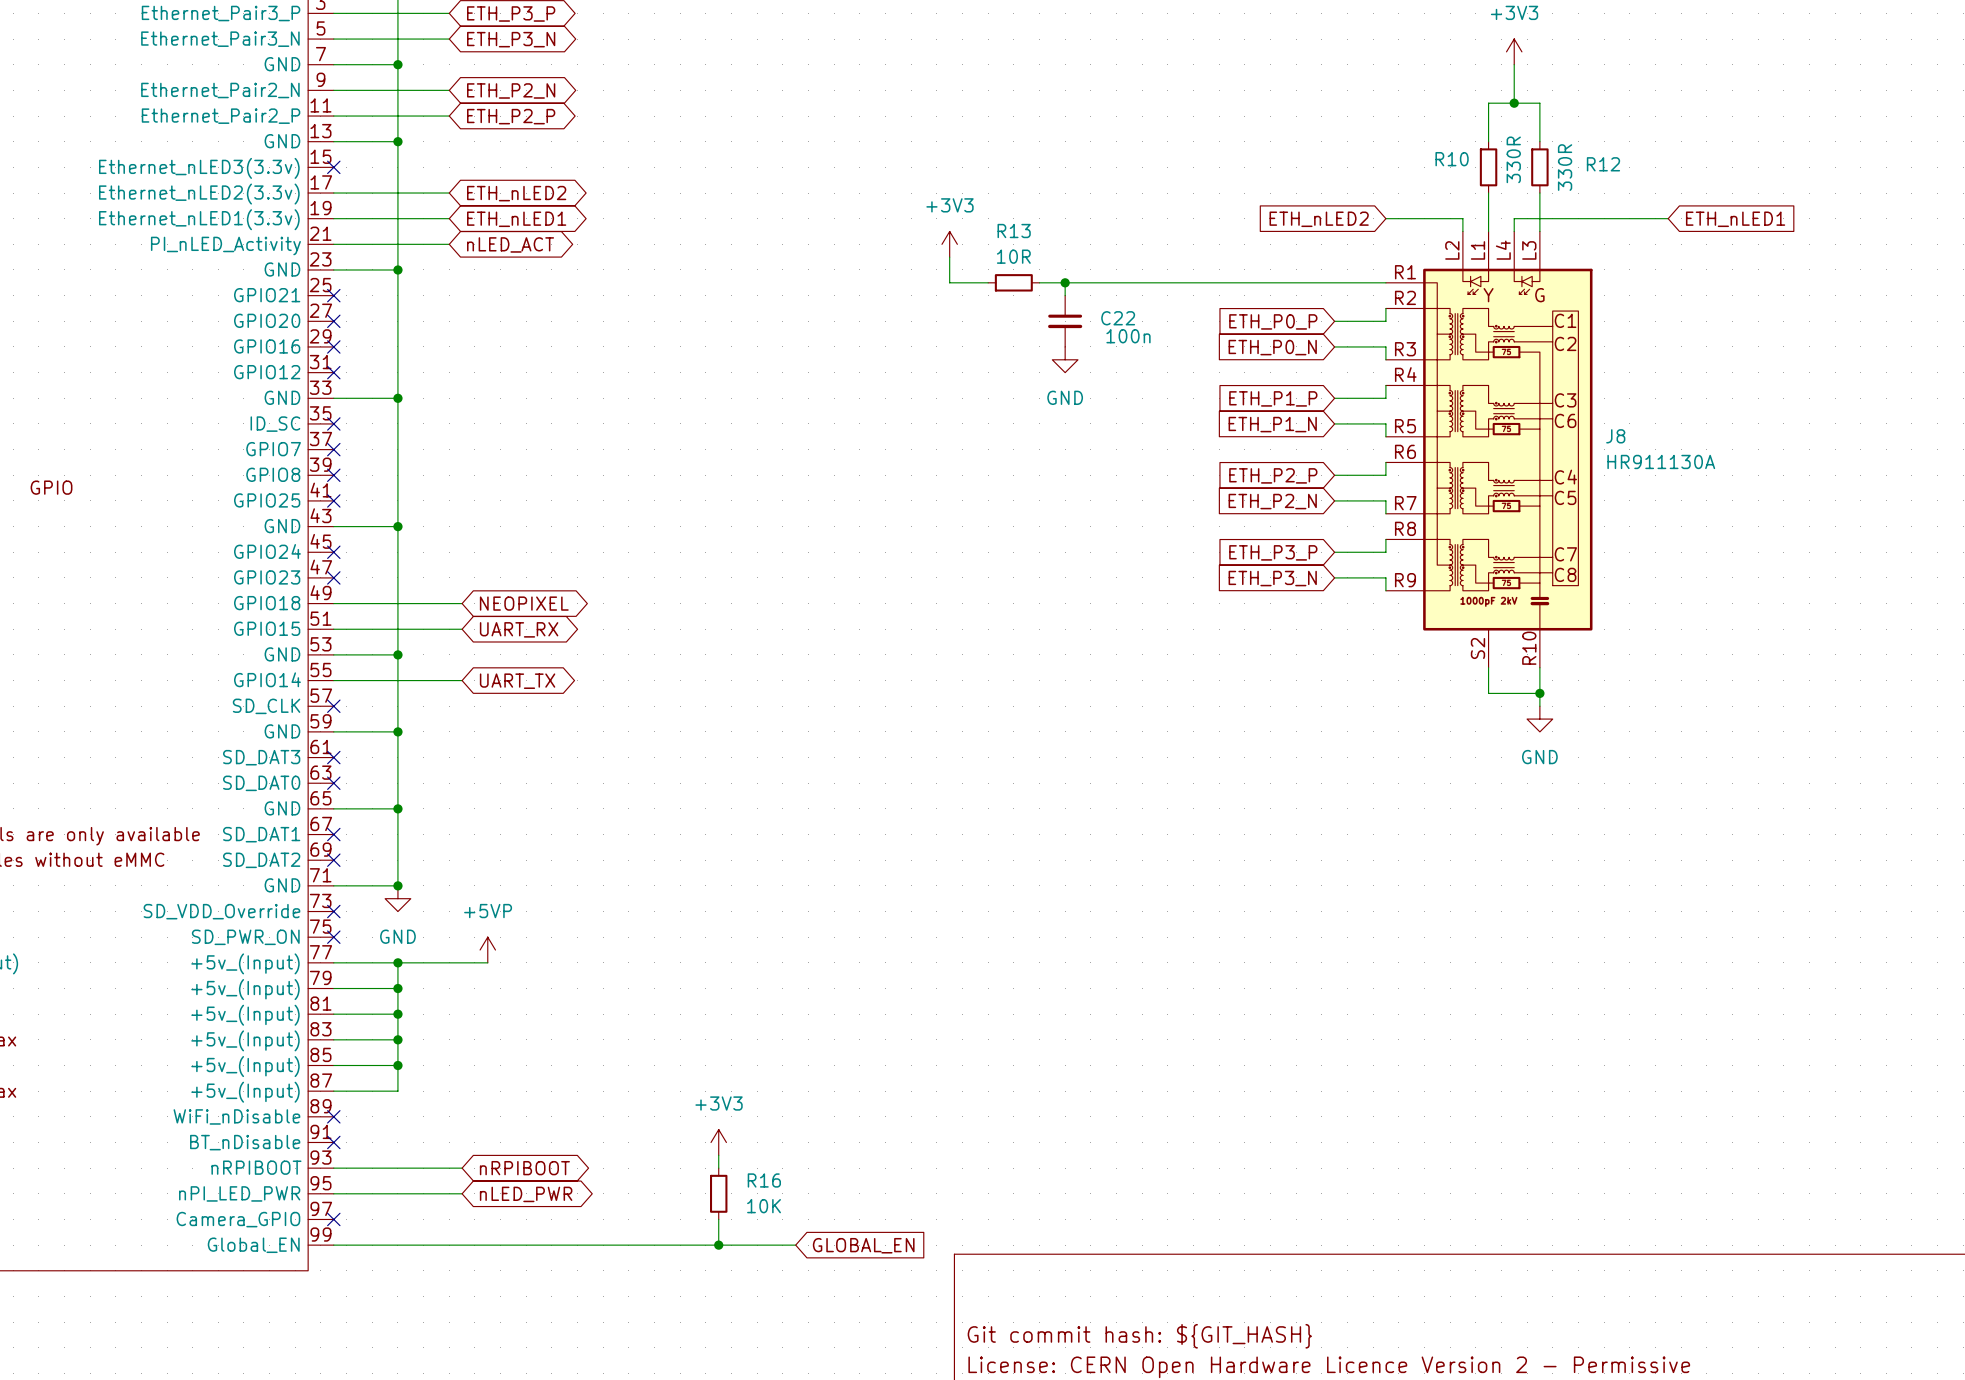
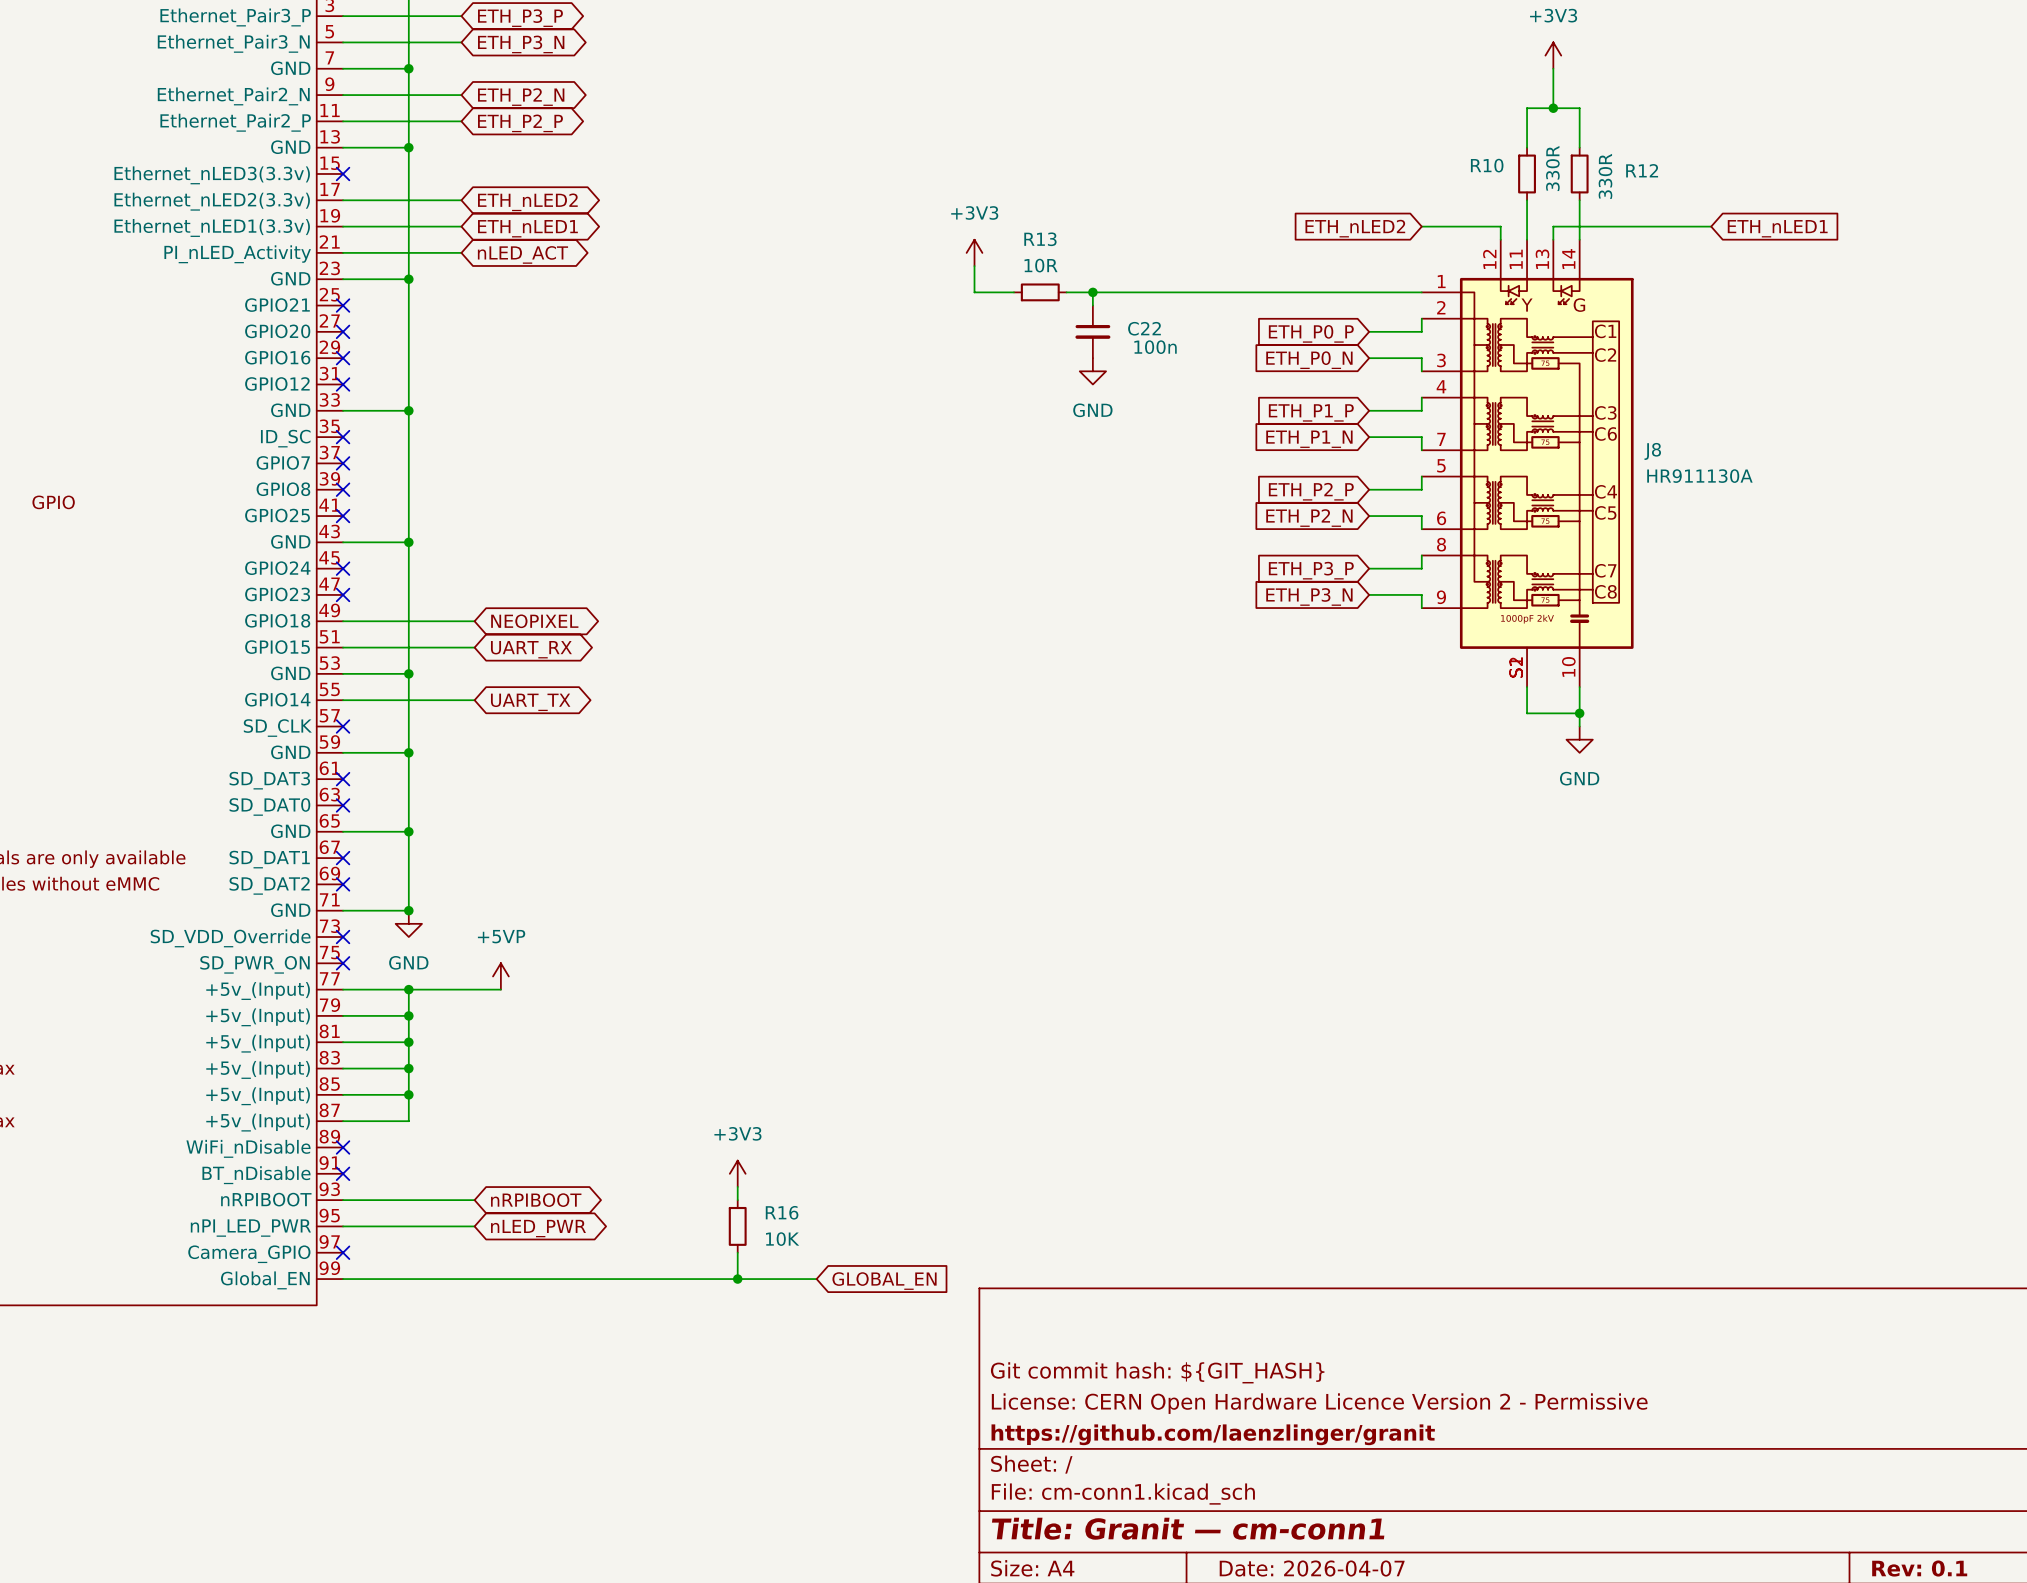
J8 symbol: [1385, 231, 1593, 668] -> [1421, 239, 1634, 688]

